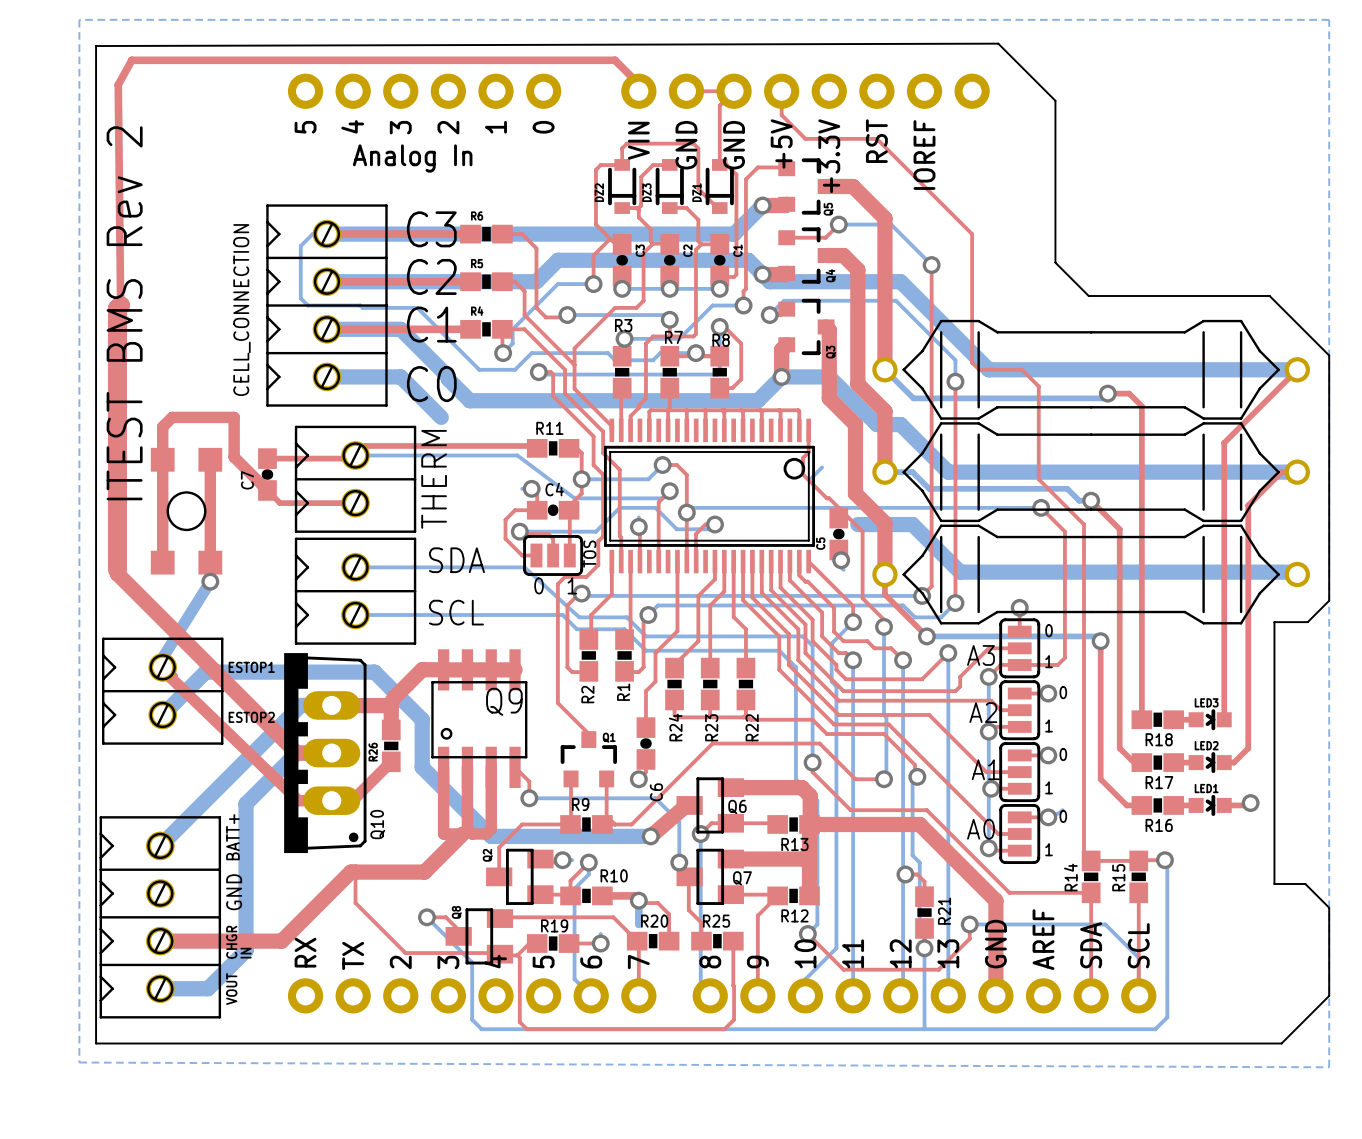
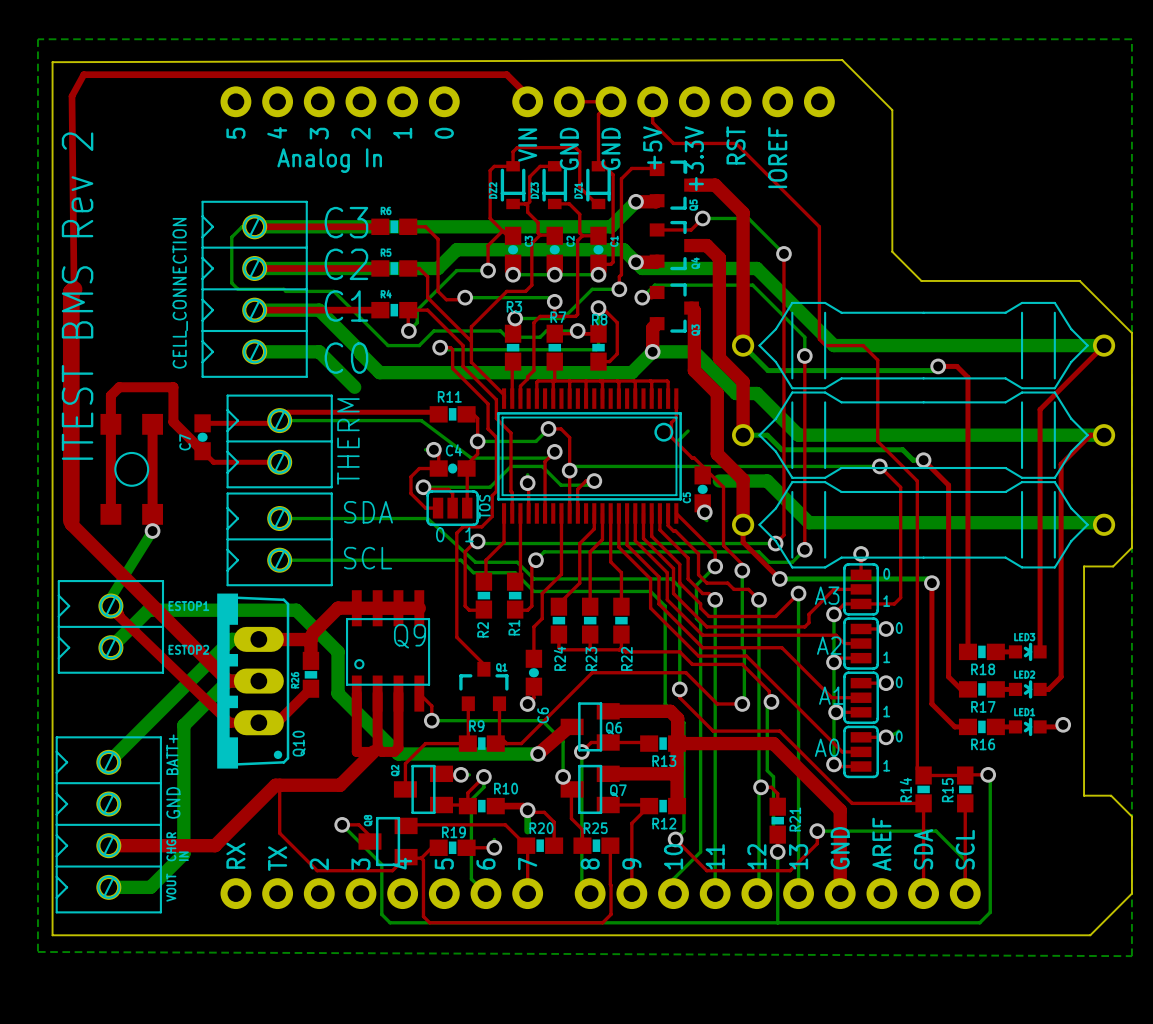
top track: (355, 903) (405, 953) (498, 953) -> (279, 812) (279, 833) (317, 870) (392, 870) (406, 857)

